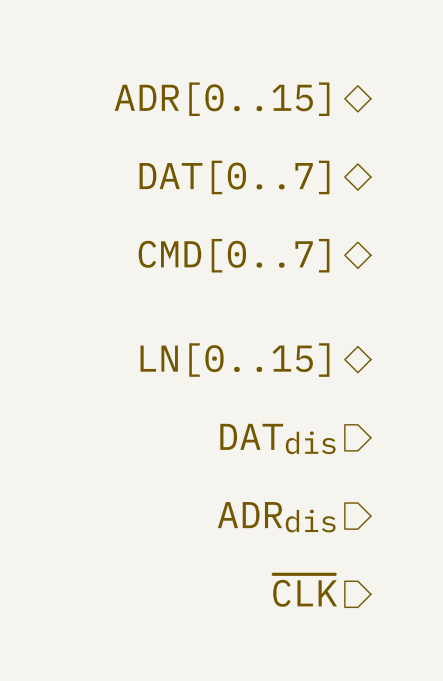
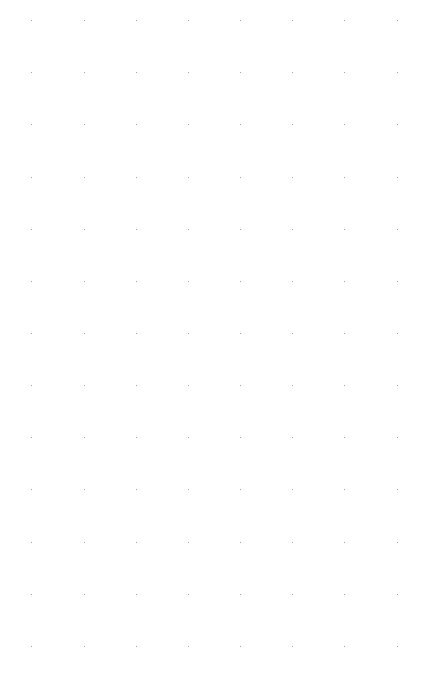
hierarchical label: ADR[0..15] (222, 99) -> none
hierarchical label: DAT[0..7] (234, 177) -> none
hierarchical label: CMD[0..7] (234, 255) -> none
hierarchical label: LN[0..15] (234, 360) -> none
hierarchical label: DATdis (277, 438) -> none
hierarchical label: ADRdis (276, 517) -> none
hierarchical label: ~{CLK} (305, 590) -> none

